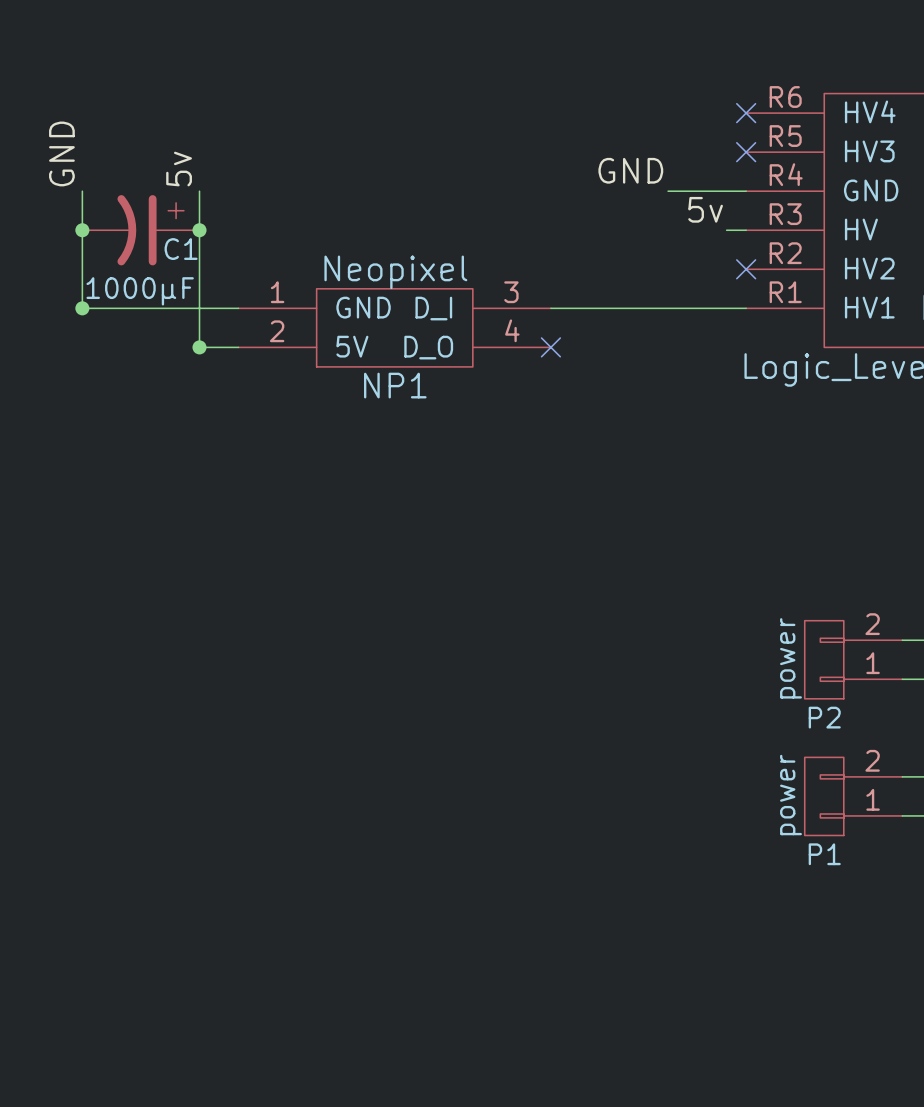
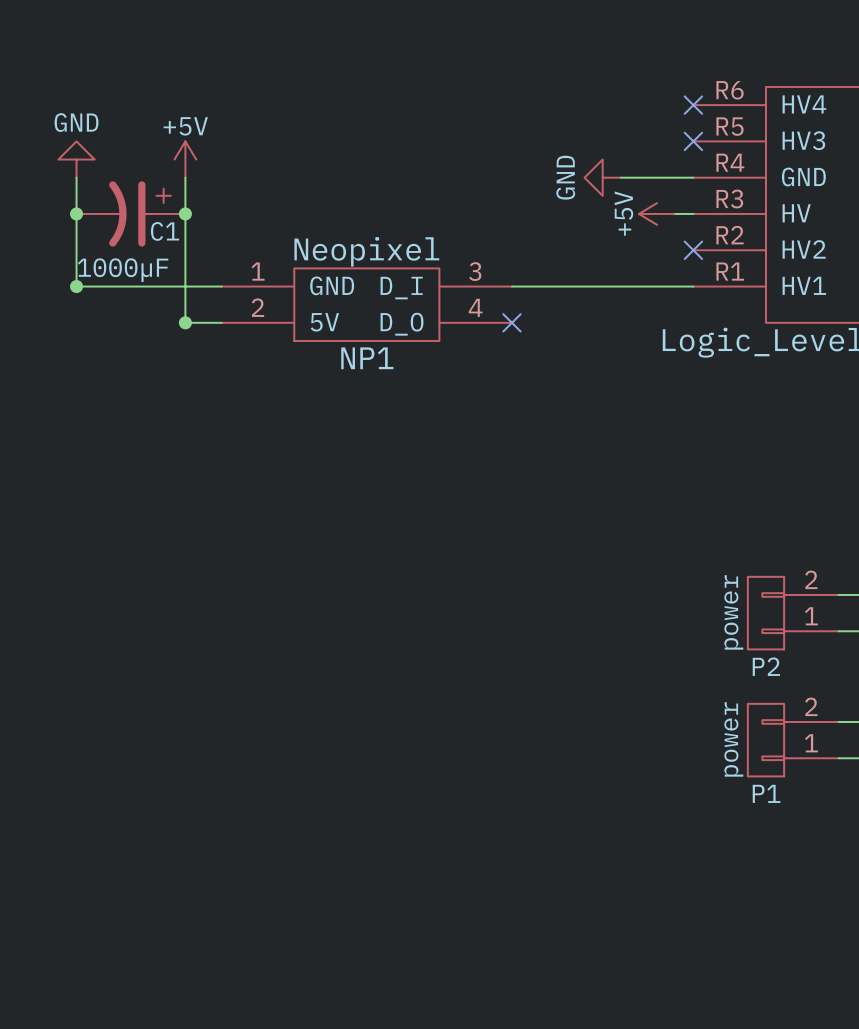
label: GND (61, 153) -> none
label: 5v (179, 169) -> none
label: GND (630, 170) -> none
power symbol: none -> GND (76, 159)
power symbol: none -> +5V (185, 159)
power symbol: none -> GND (602, 177)
label: 5v (705, 209) -> none
power symbol: none -> +5V (657, 213)

